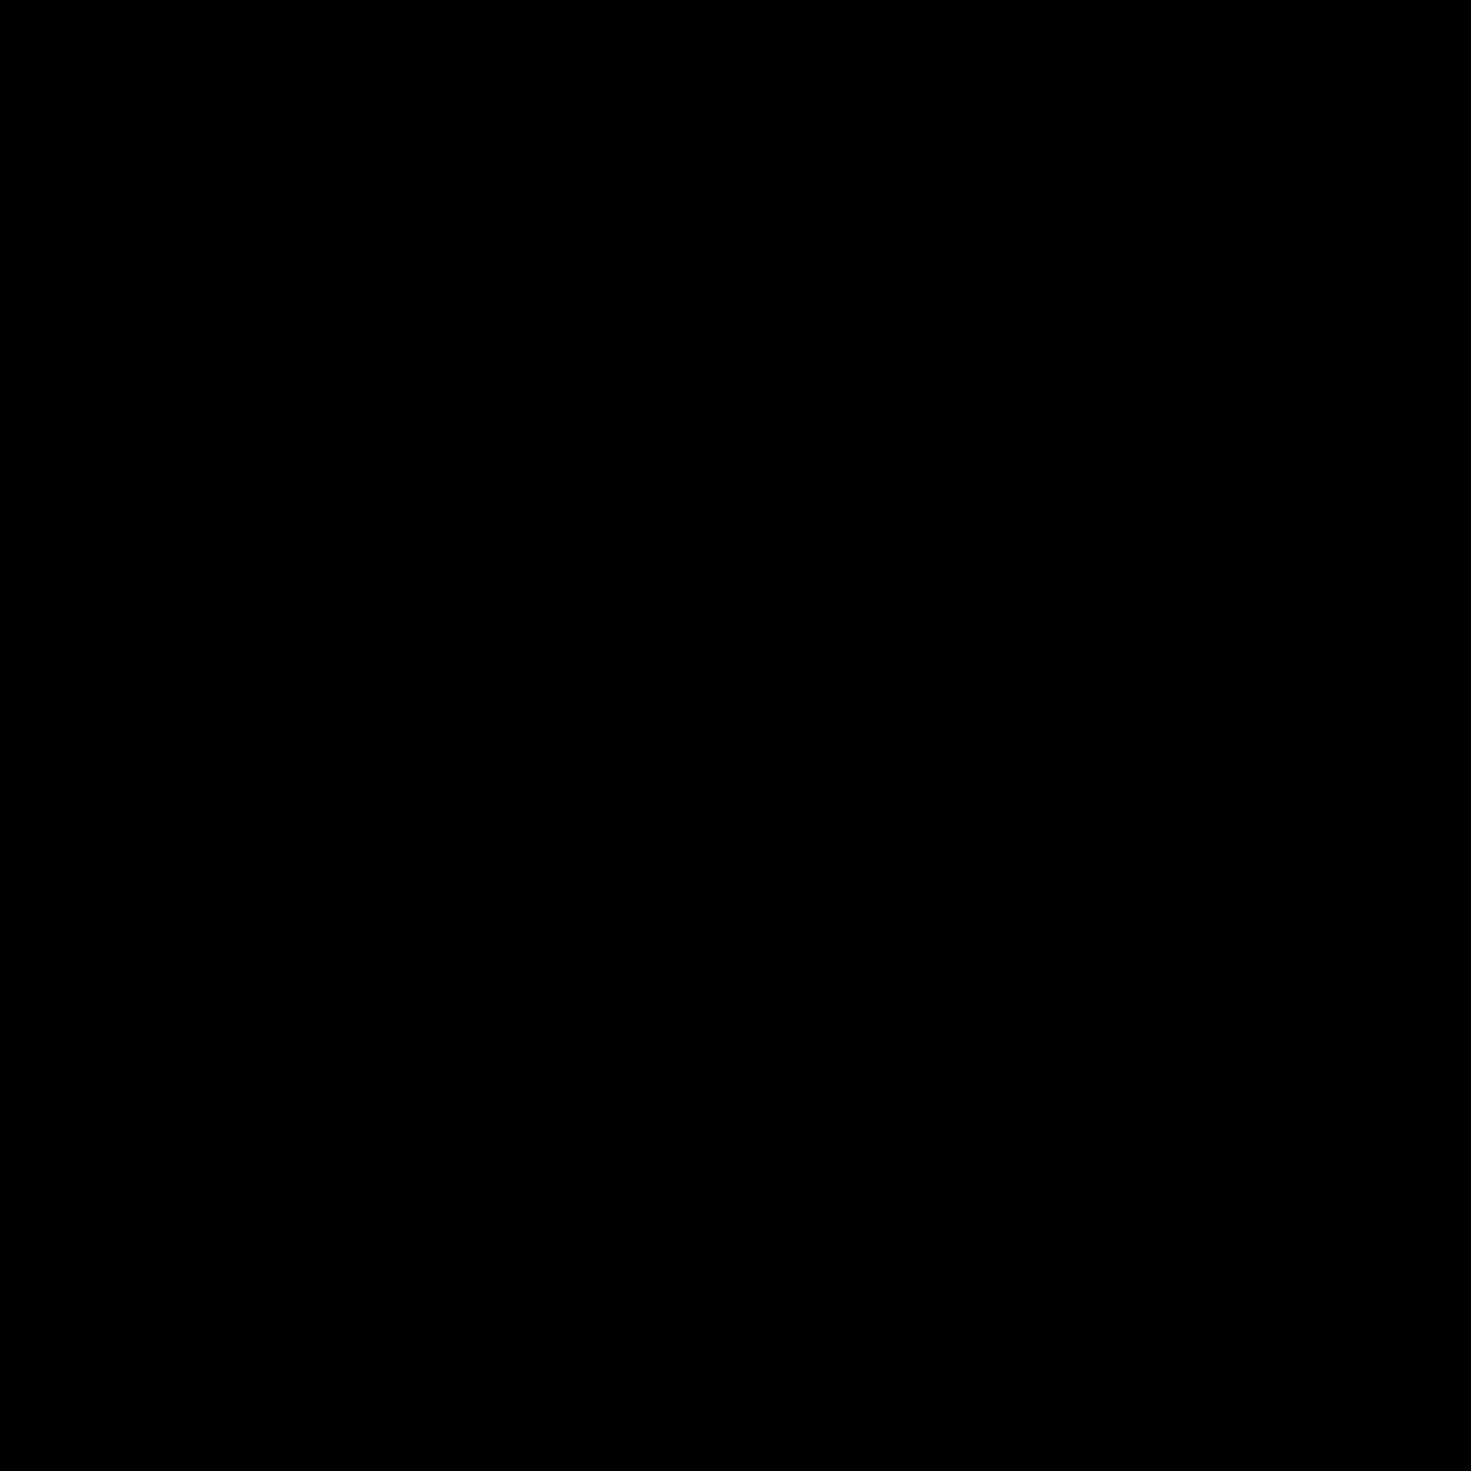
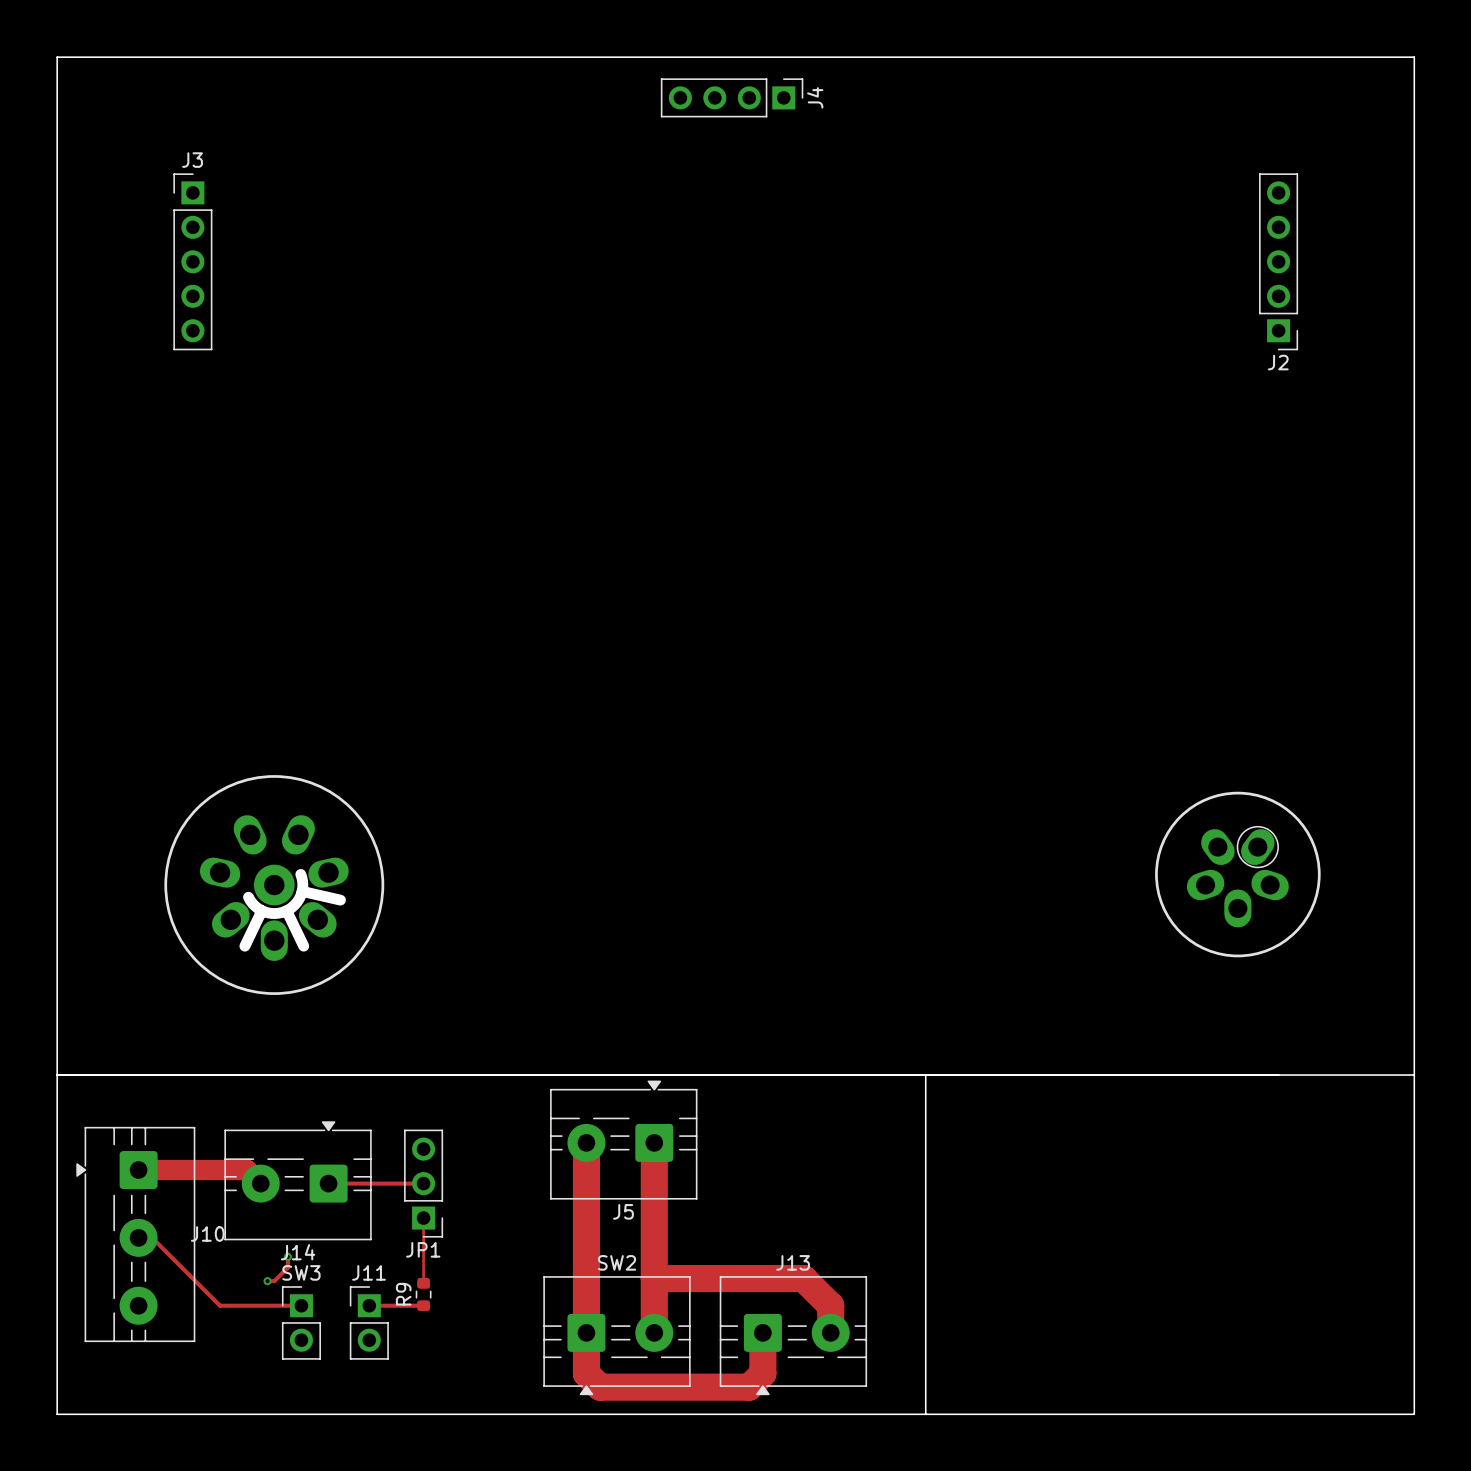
board edge: none -> (57, 57) (1414, 57) (1414, 1414) (57, 1414) (57, 57)
J4: none -> (732, 97)
J3: none -> (192, 261)
J2: none -> (1278, 261)
part: none -> (1237, 874)
part: none -> (274, 885)
board edge: none -> (57, 1075) (1414, 1075)
board edge: none -> (925, 1075) (925, 1414)
J5: none -> (623, 1140)
track: none -> (586, 1142) (586, 1373) (600, 1387) (749, 1387) (762, 1373) (762, 1332)
track: none -> (654, 1142) (654, 1332)
track: none -> (138, 1170) (247, 1170) (260, 1183)
J14: none -> (298, 1180)
track: none -> (328, 1183) (423, 1183)
JP1: none -> (423, 1183)
track: none -> (423, 1218) (423, 1278)
J10: none -> (135, 1234)
track: none -> (138, 1237) (152, 1237) (220, 1305) (301, 1305)
track: none -> (287, 1256) (287, 1267) (274, 1281) (267, 1281)
via: none -> (287, 1256)
track: none -> (654, 1278) (803, 1278) (830, 1305) (830, 1332)
via: none -> (267, 1281)
R9: none -> (423, 1294)
track: none -> (369, 1305) (423, 1305)
SW3: none -> (301, 1322)
J11: none -> (369, 1322)
SW2: none -> (616, 1335)
J13: none -> (793, 1335)

